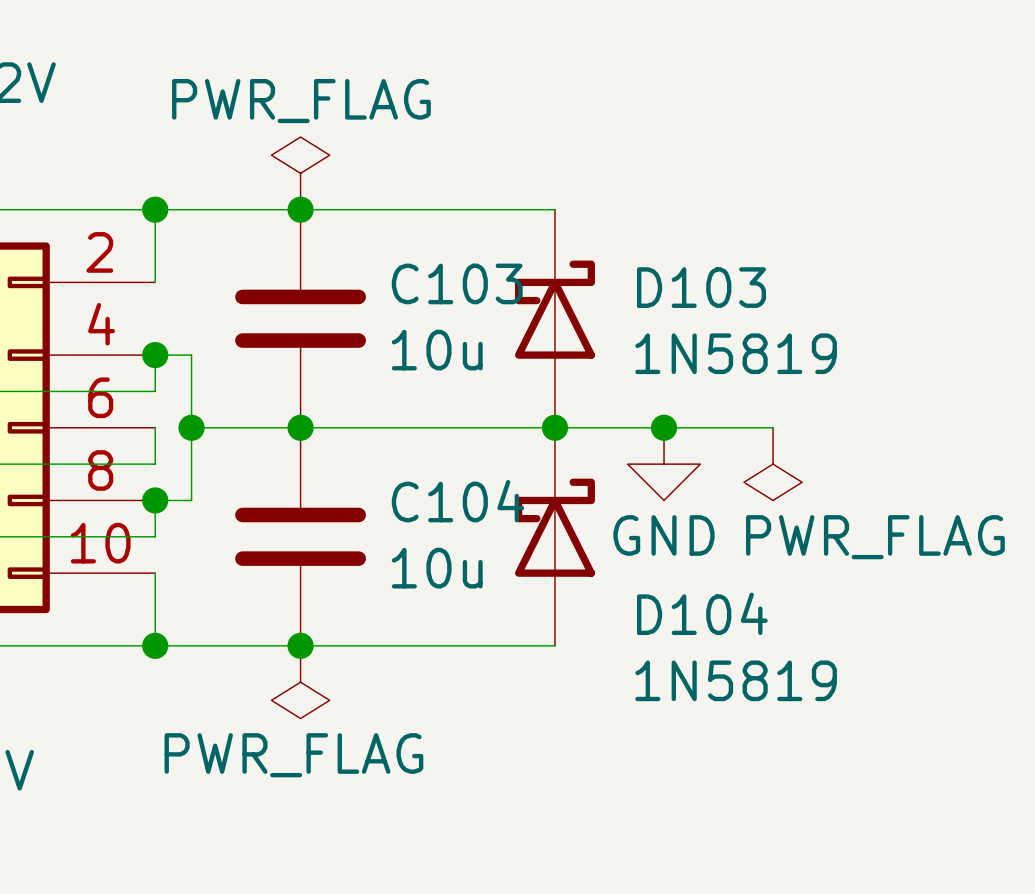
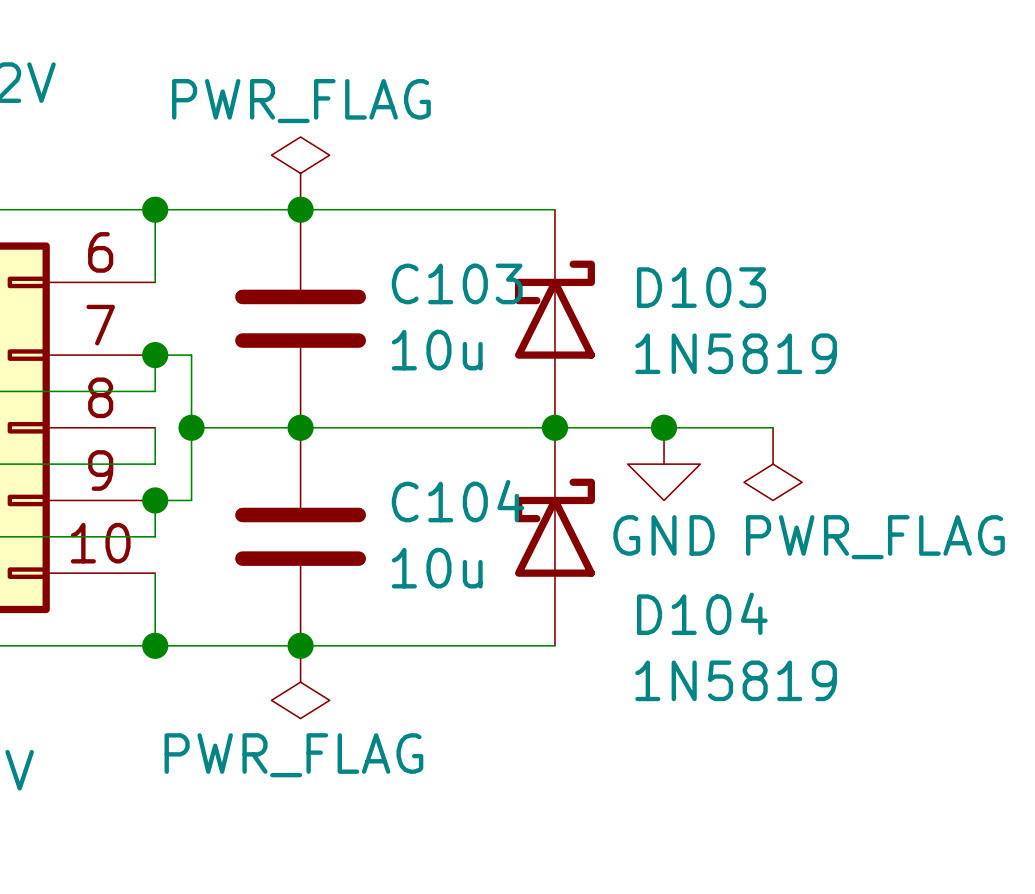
part pin number: 2 (99, 252) -> 6 (100, 252)
part pin number: 4 (101, 324) -> 7 (100, 325)
part pin number: 6 (100, 397) -> 8 (100, 397)
part pin number: 8 (100, 470) -> 9 (100, 470)

